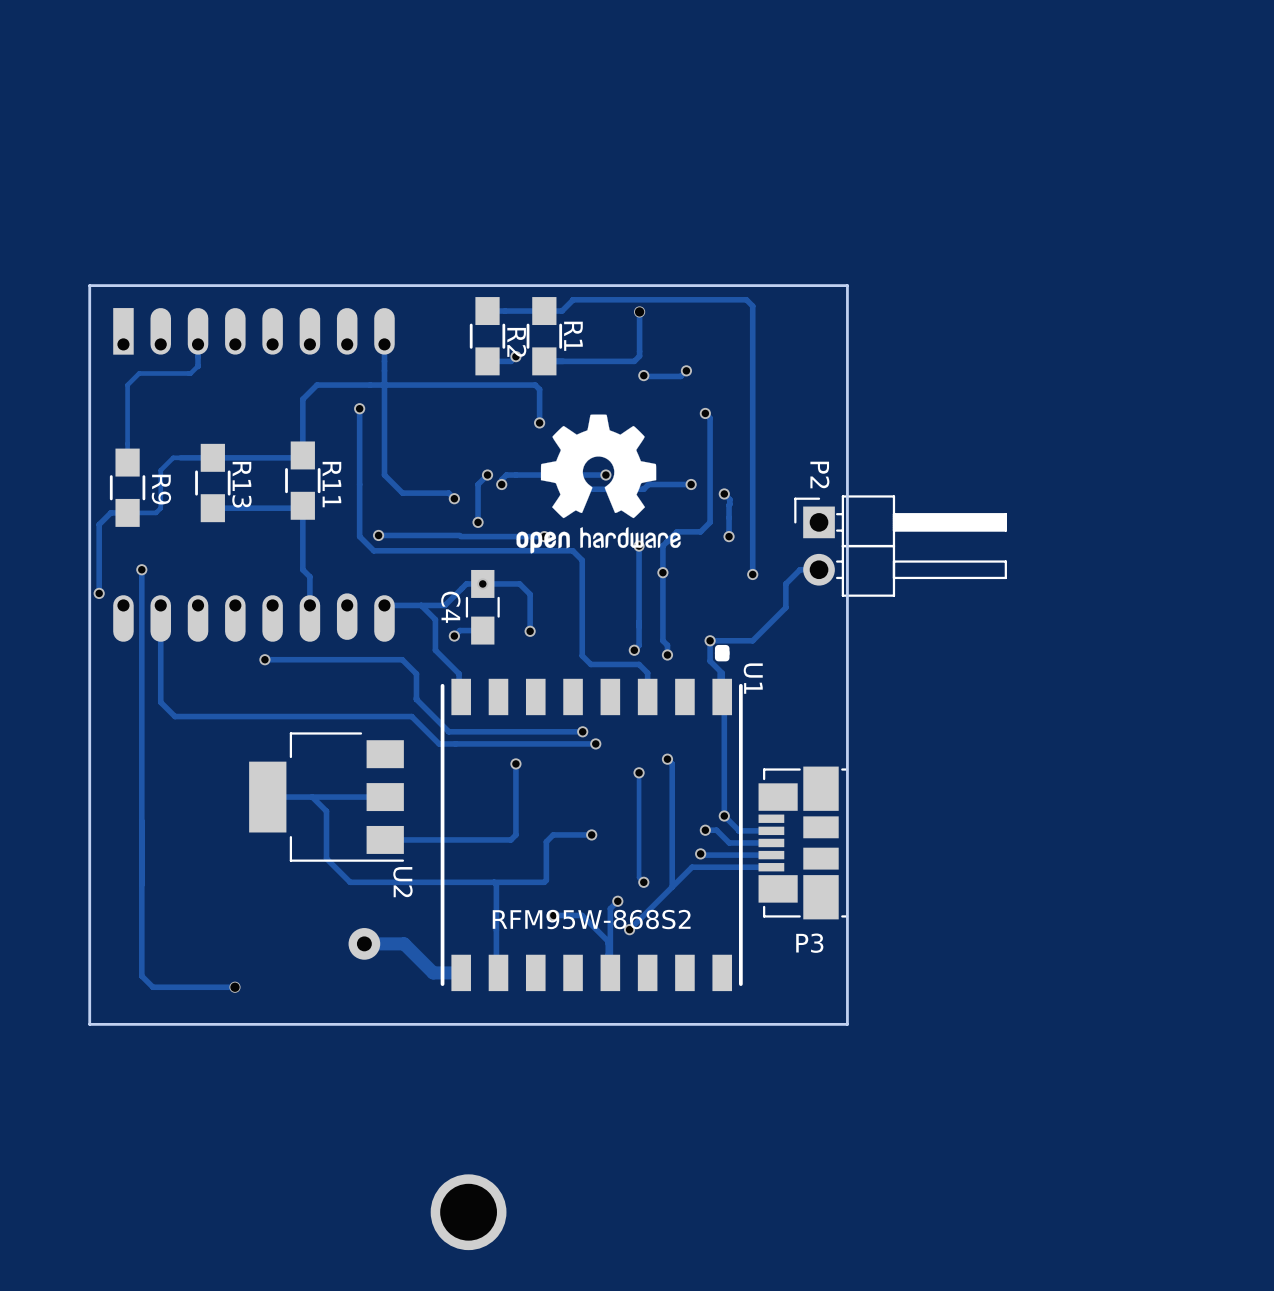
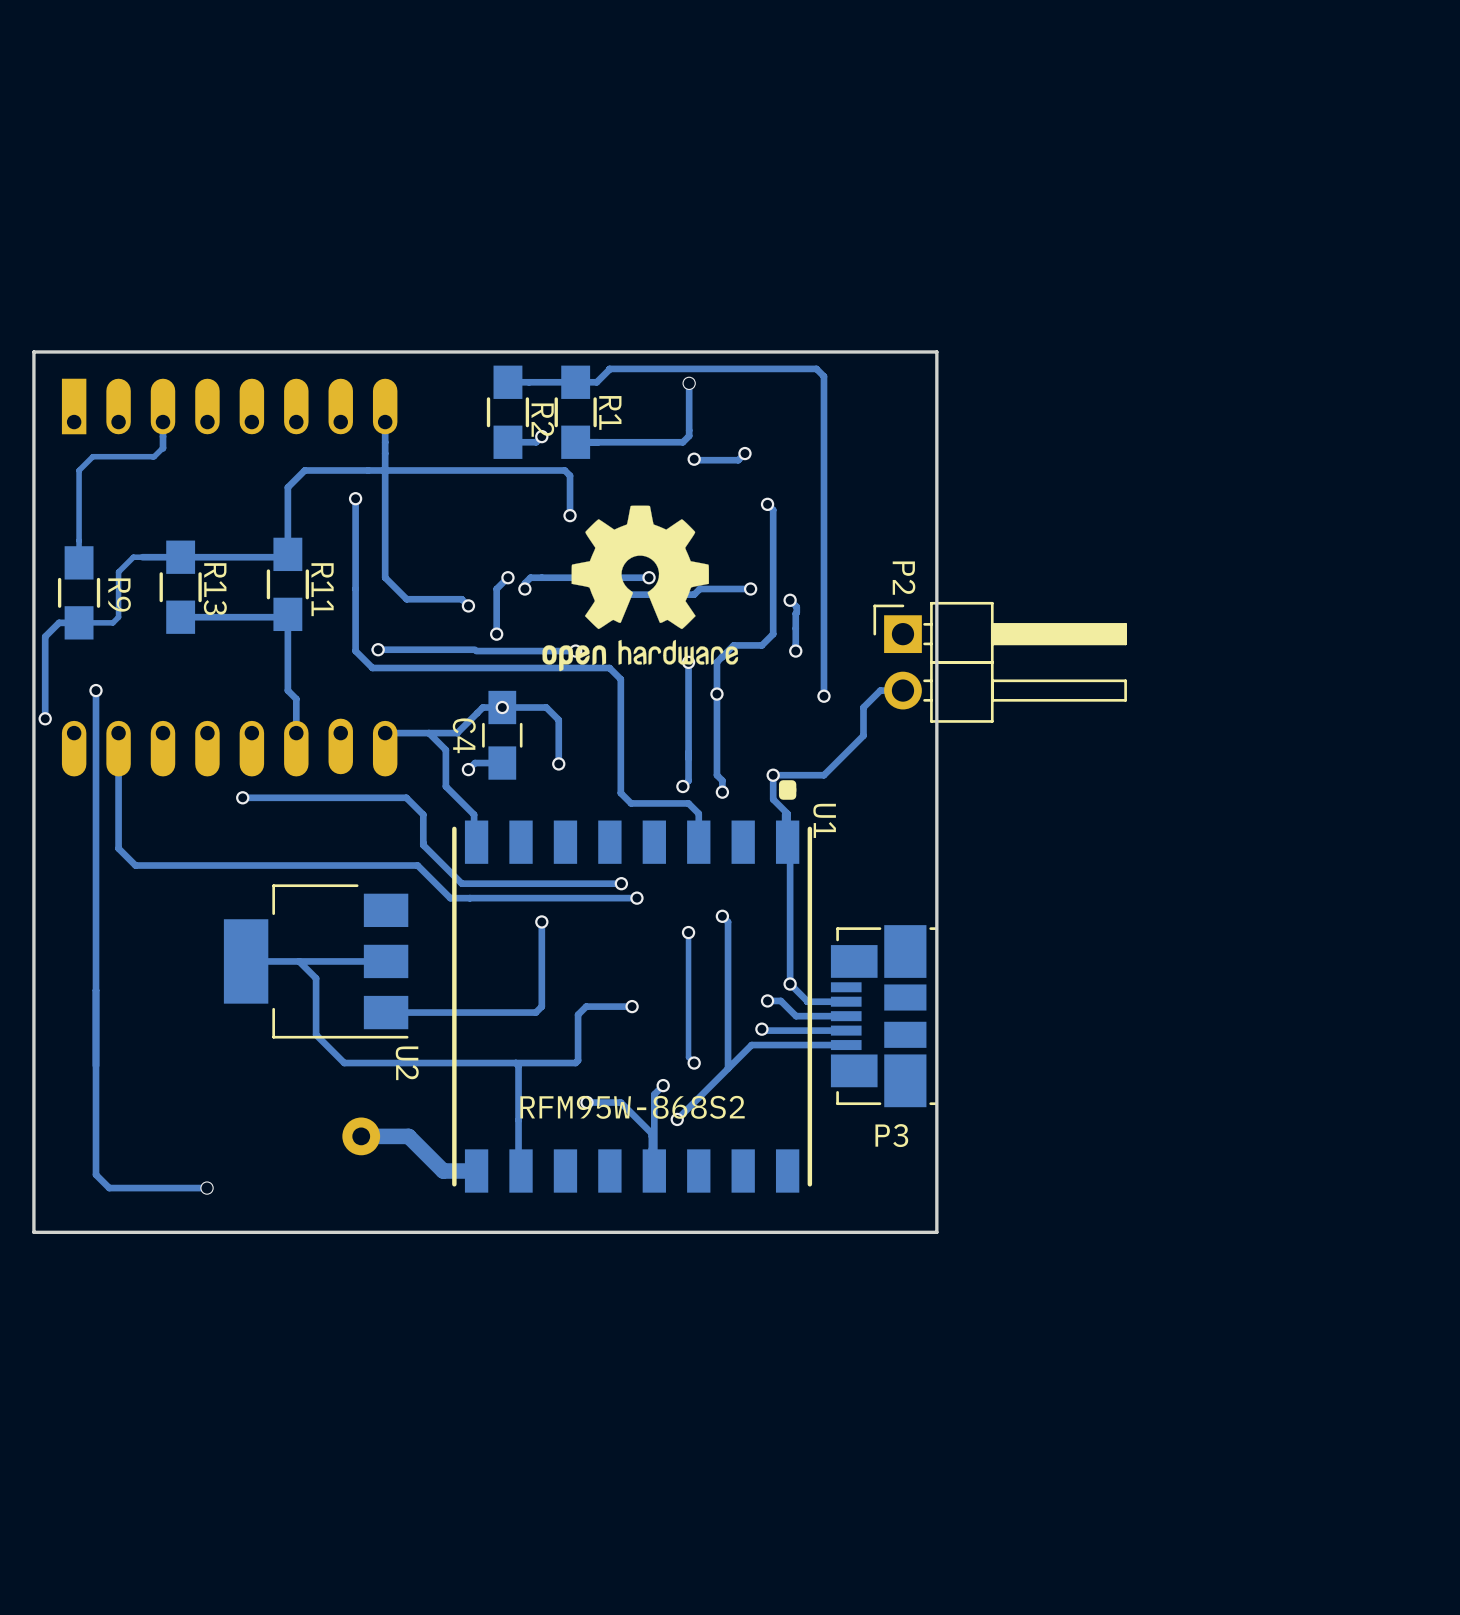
part: (468, 1212) -> none

